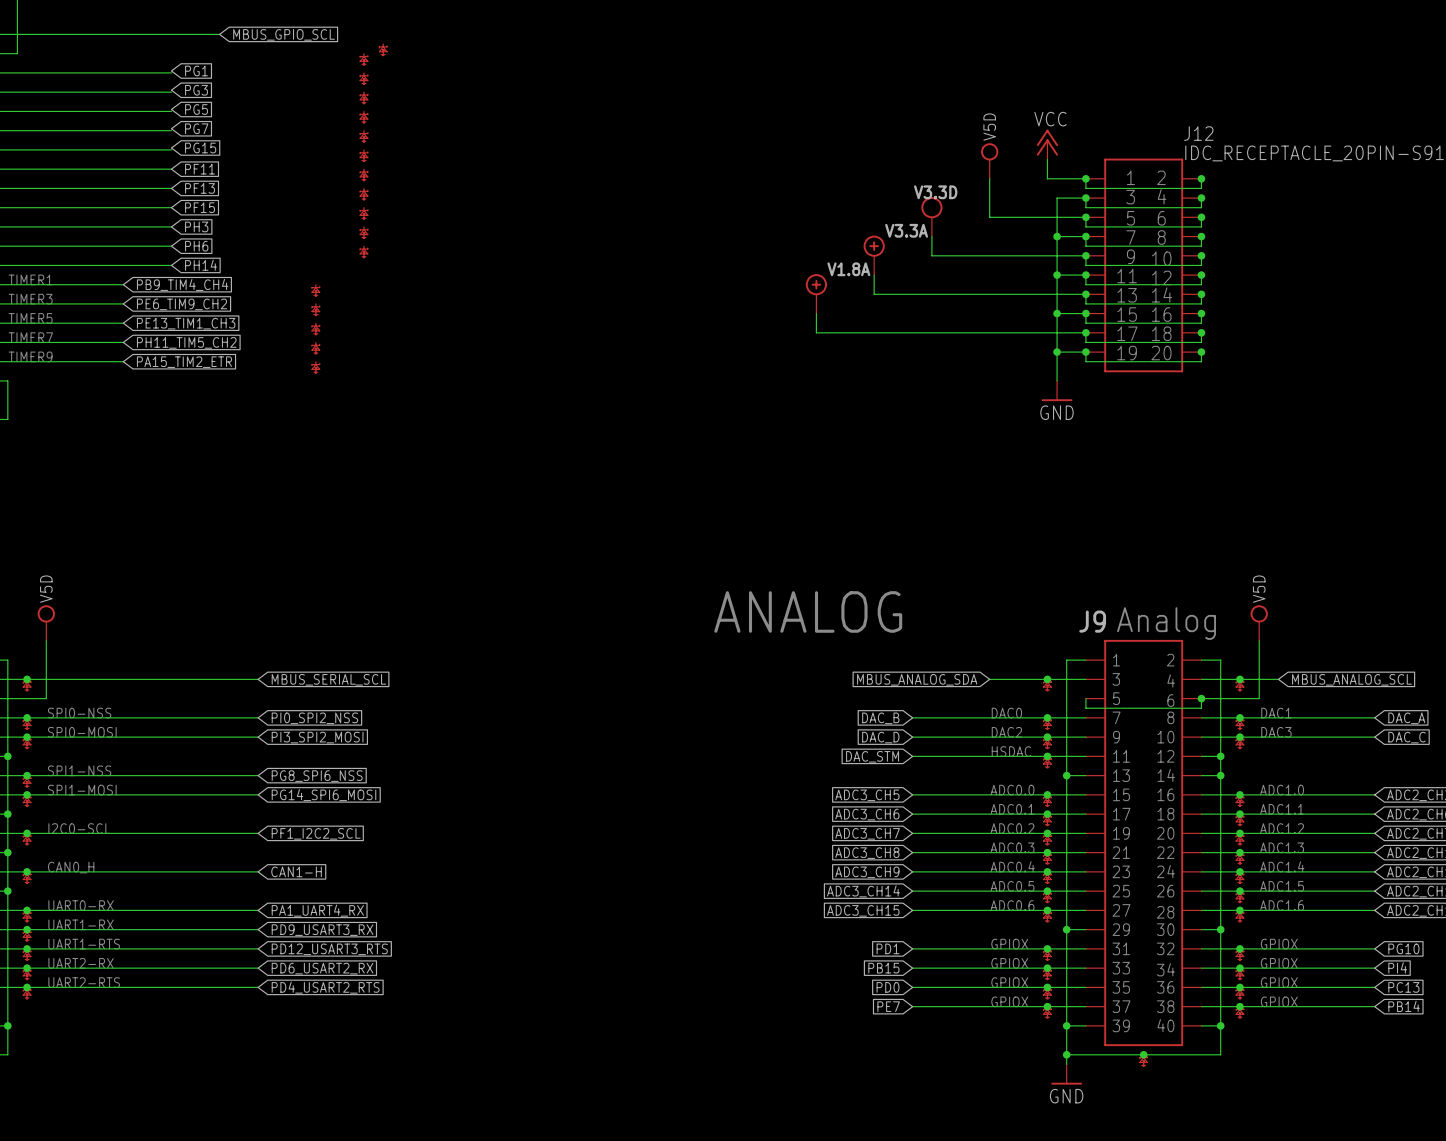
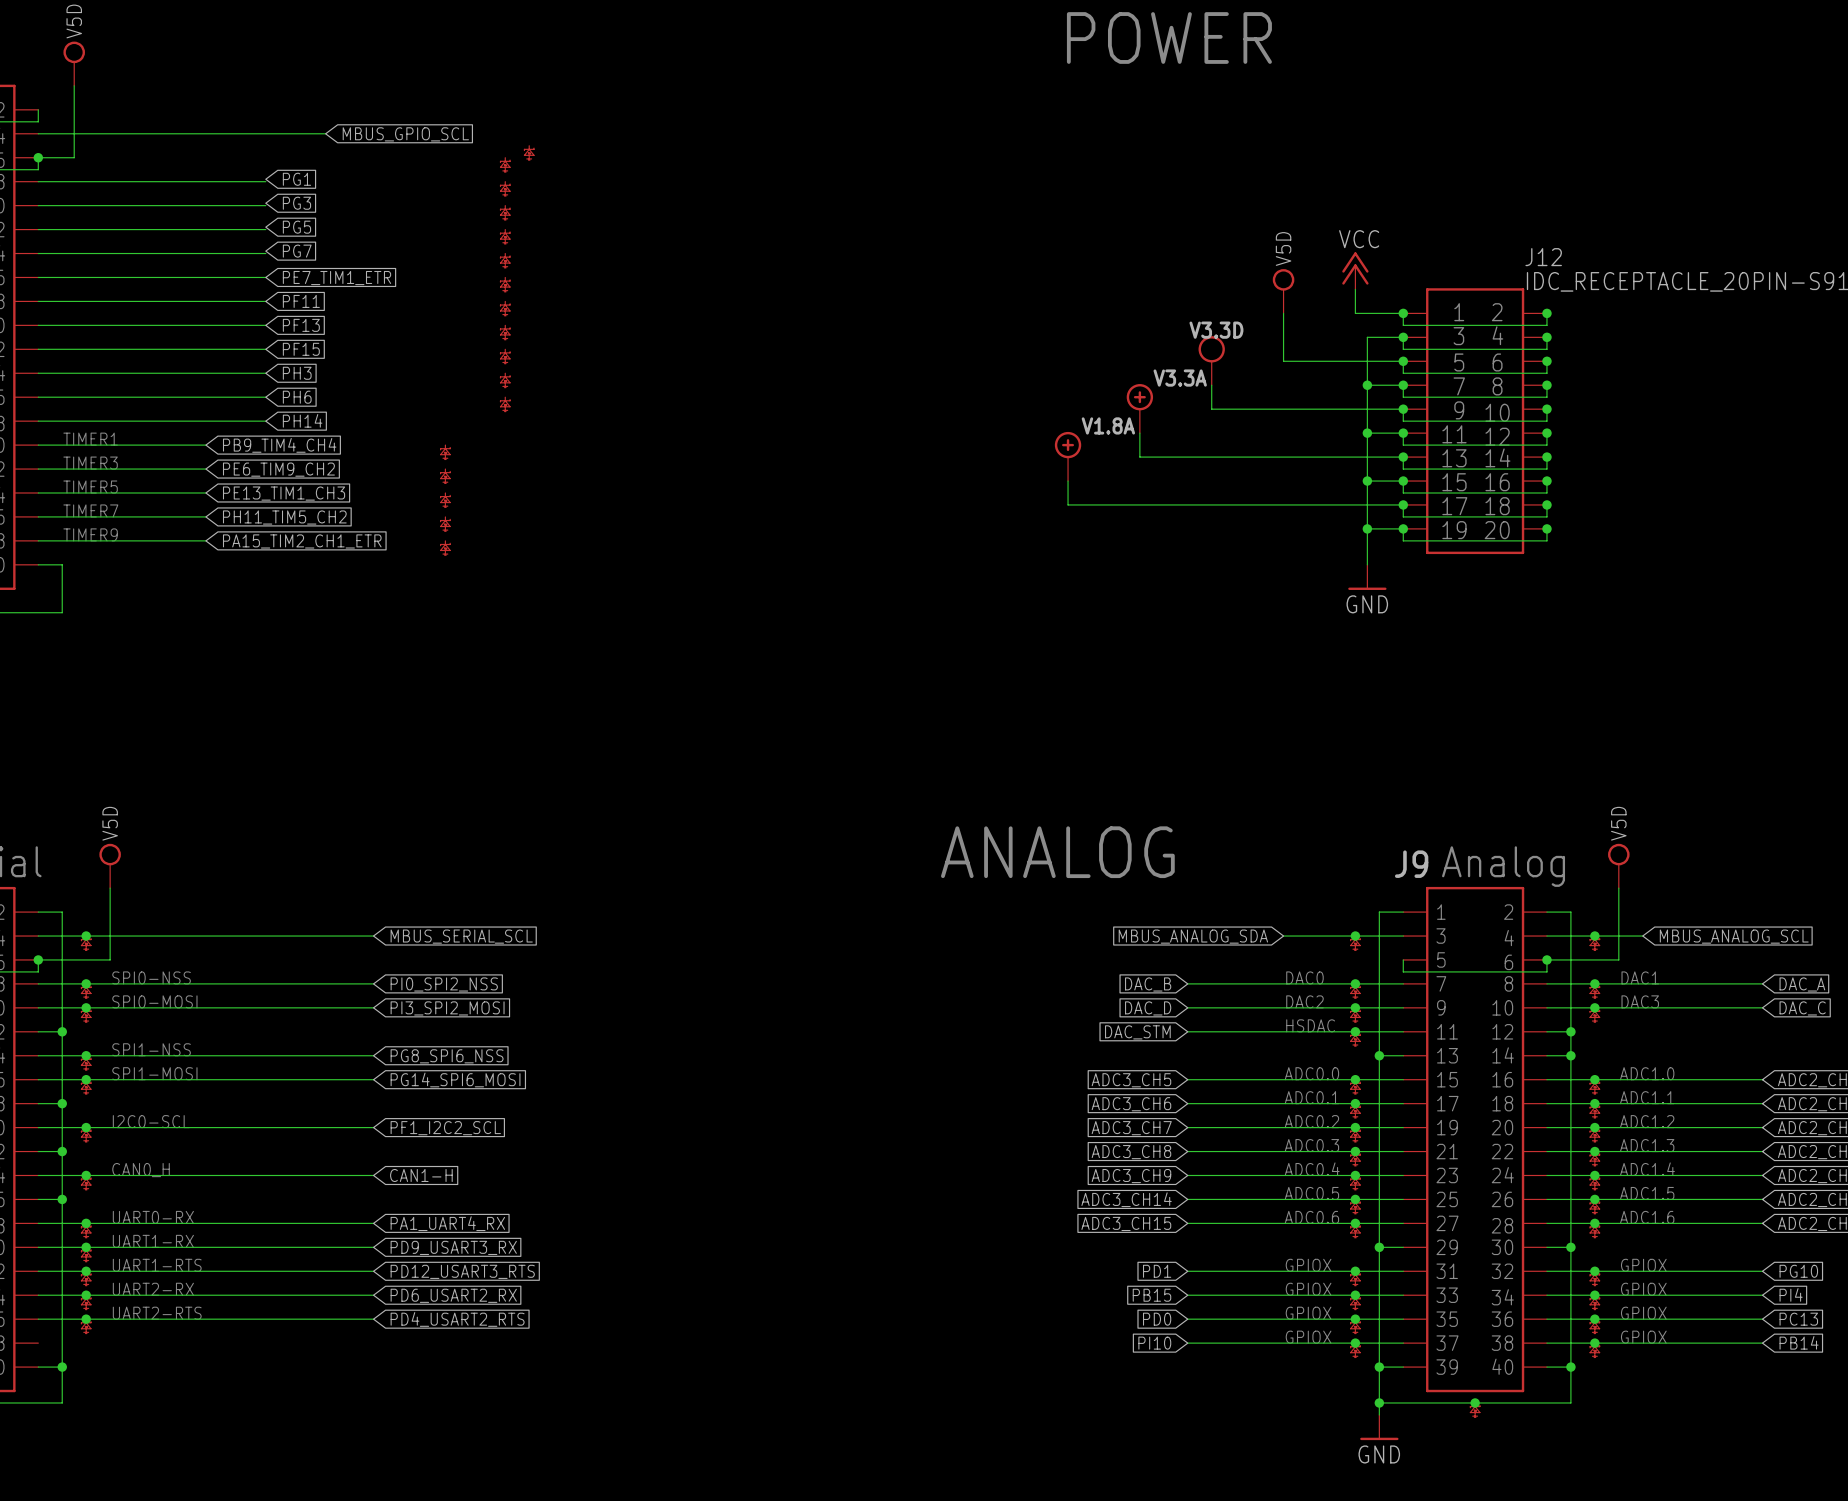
global label: PG15 (200, 148) -> PE7_TIM1_ETR (336, 278)
global label: PA15_TIM2_ETR (184, 362) -> PA15_TIM2_CH1_ETR (302, 541)
global label: PE7 (888, 1006) -> PI10 (1154, 1343)

